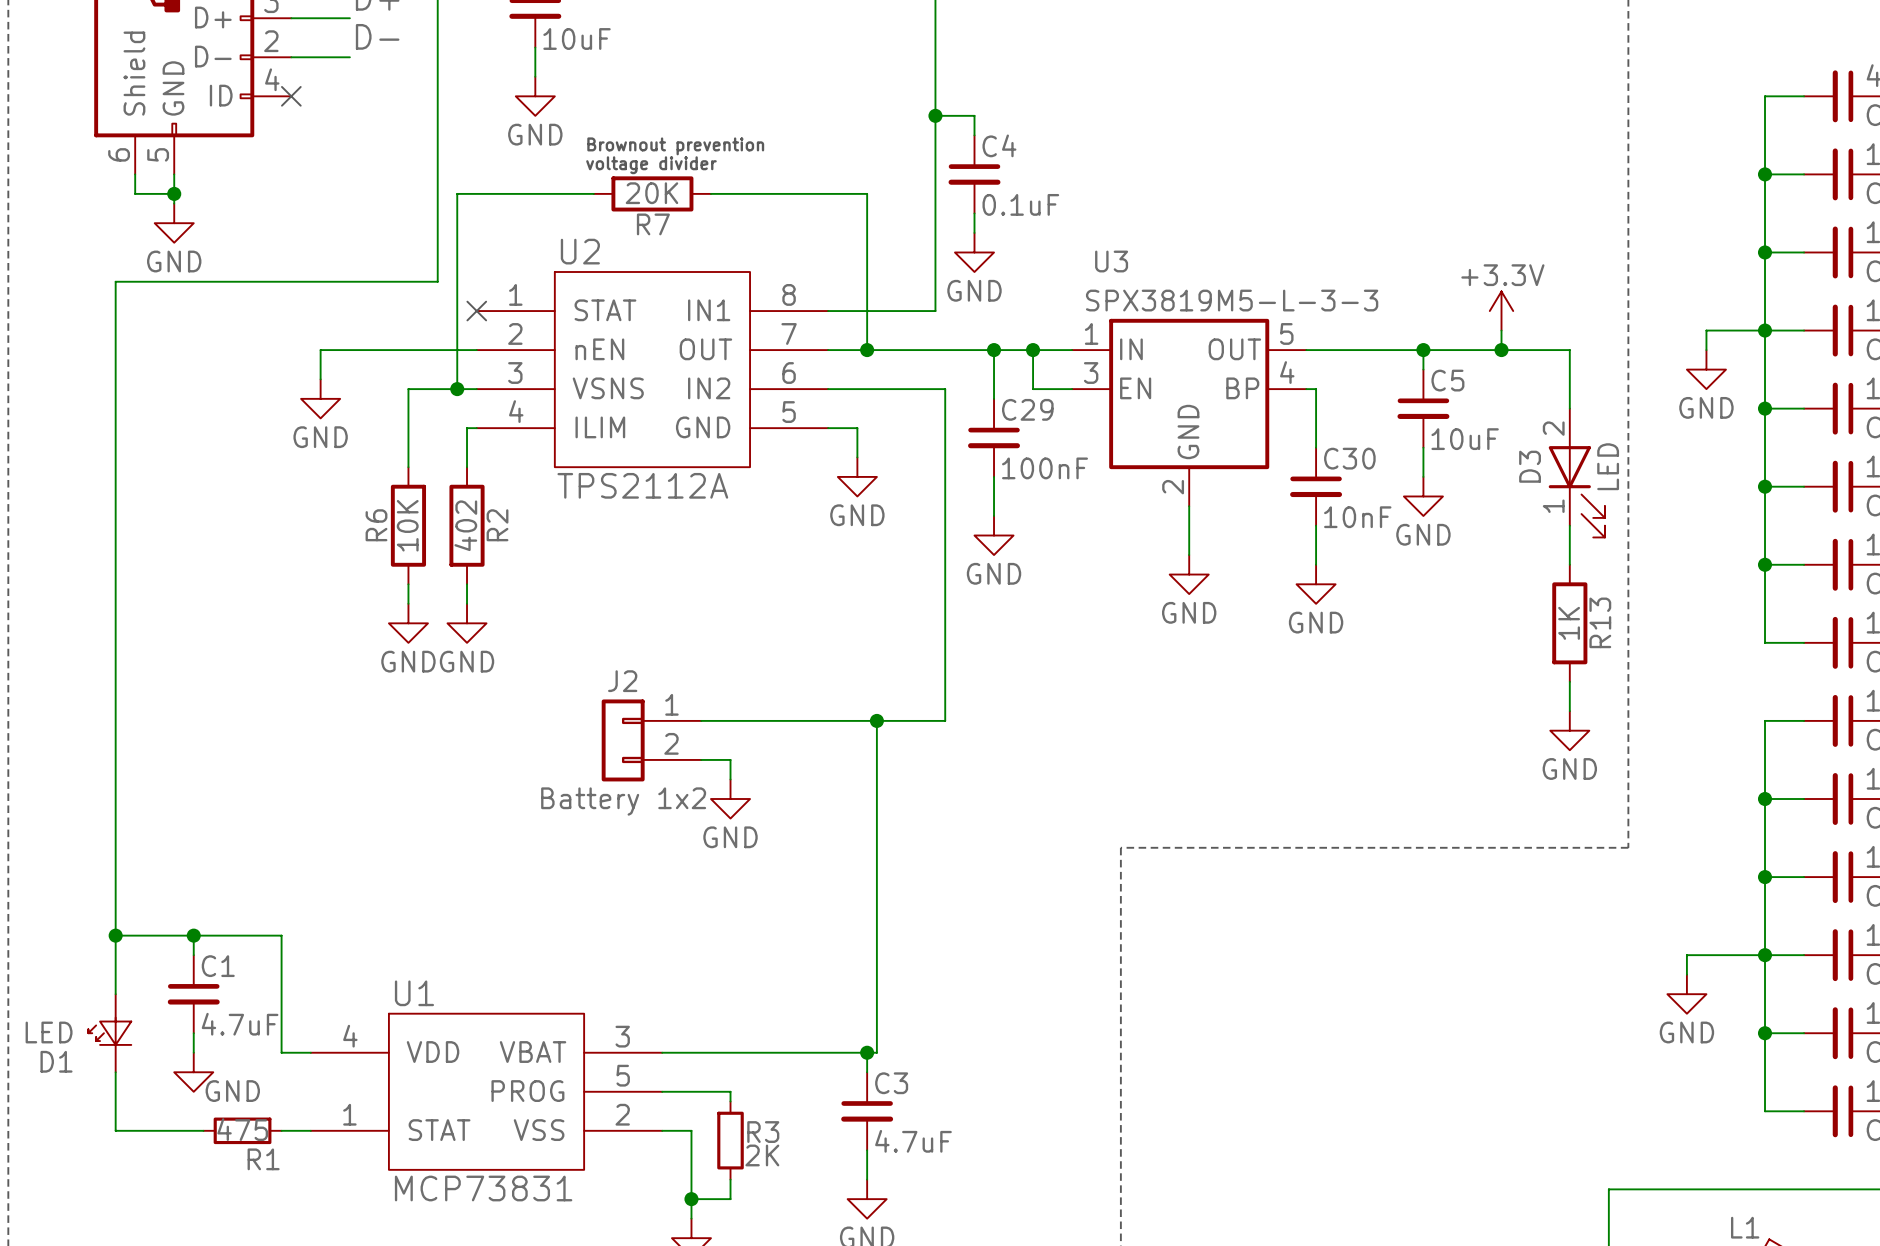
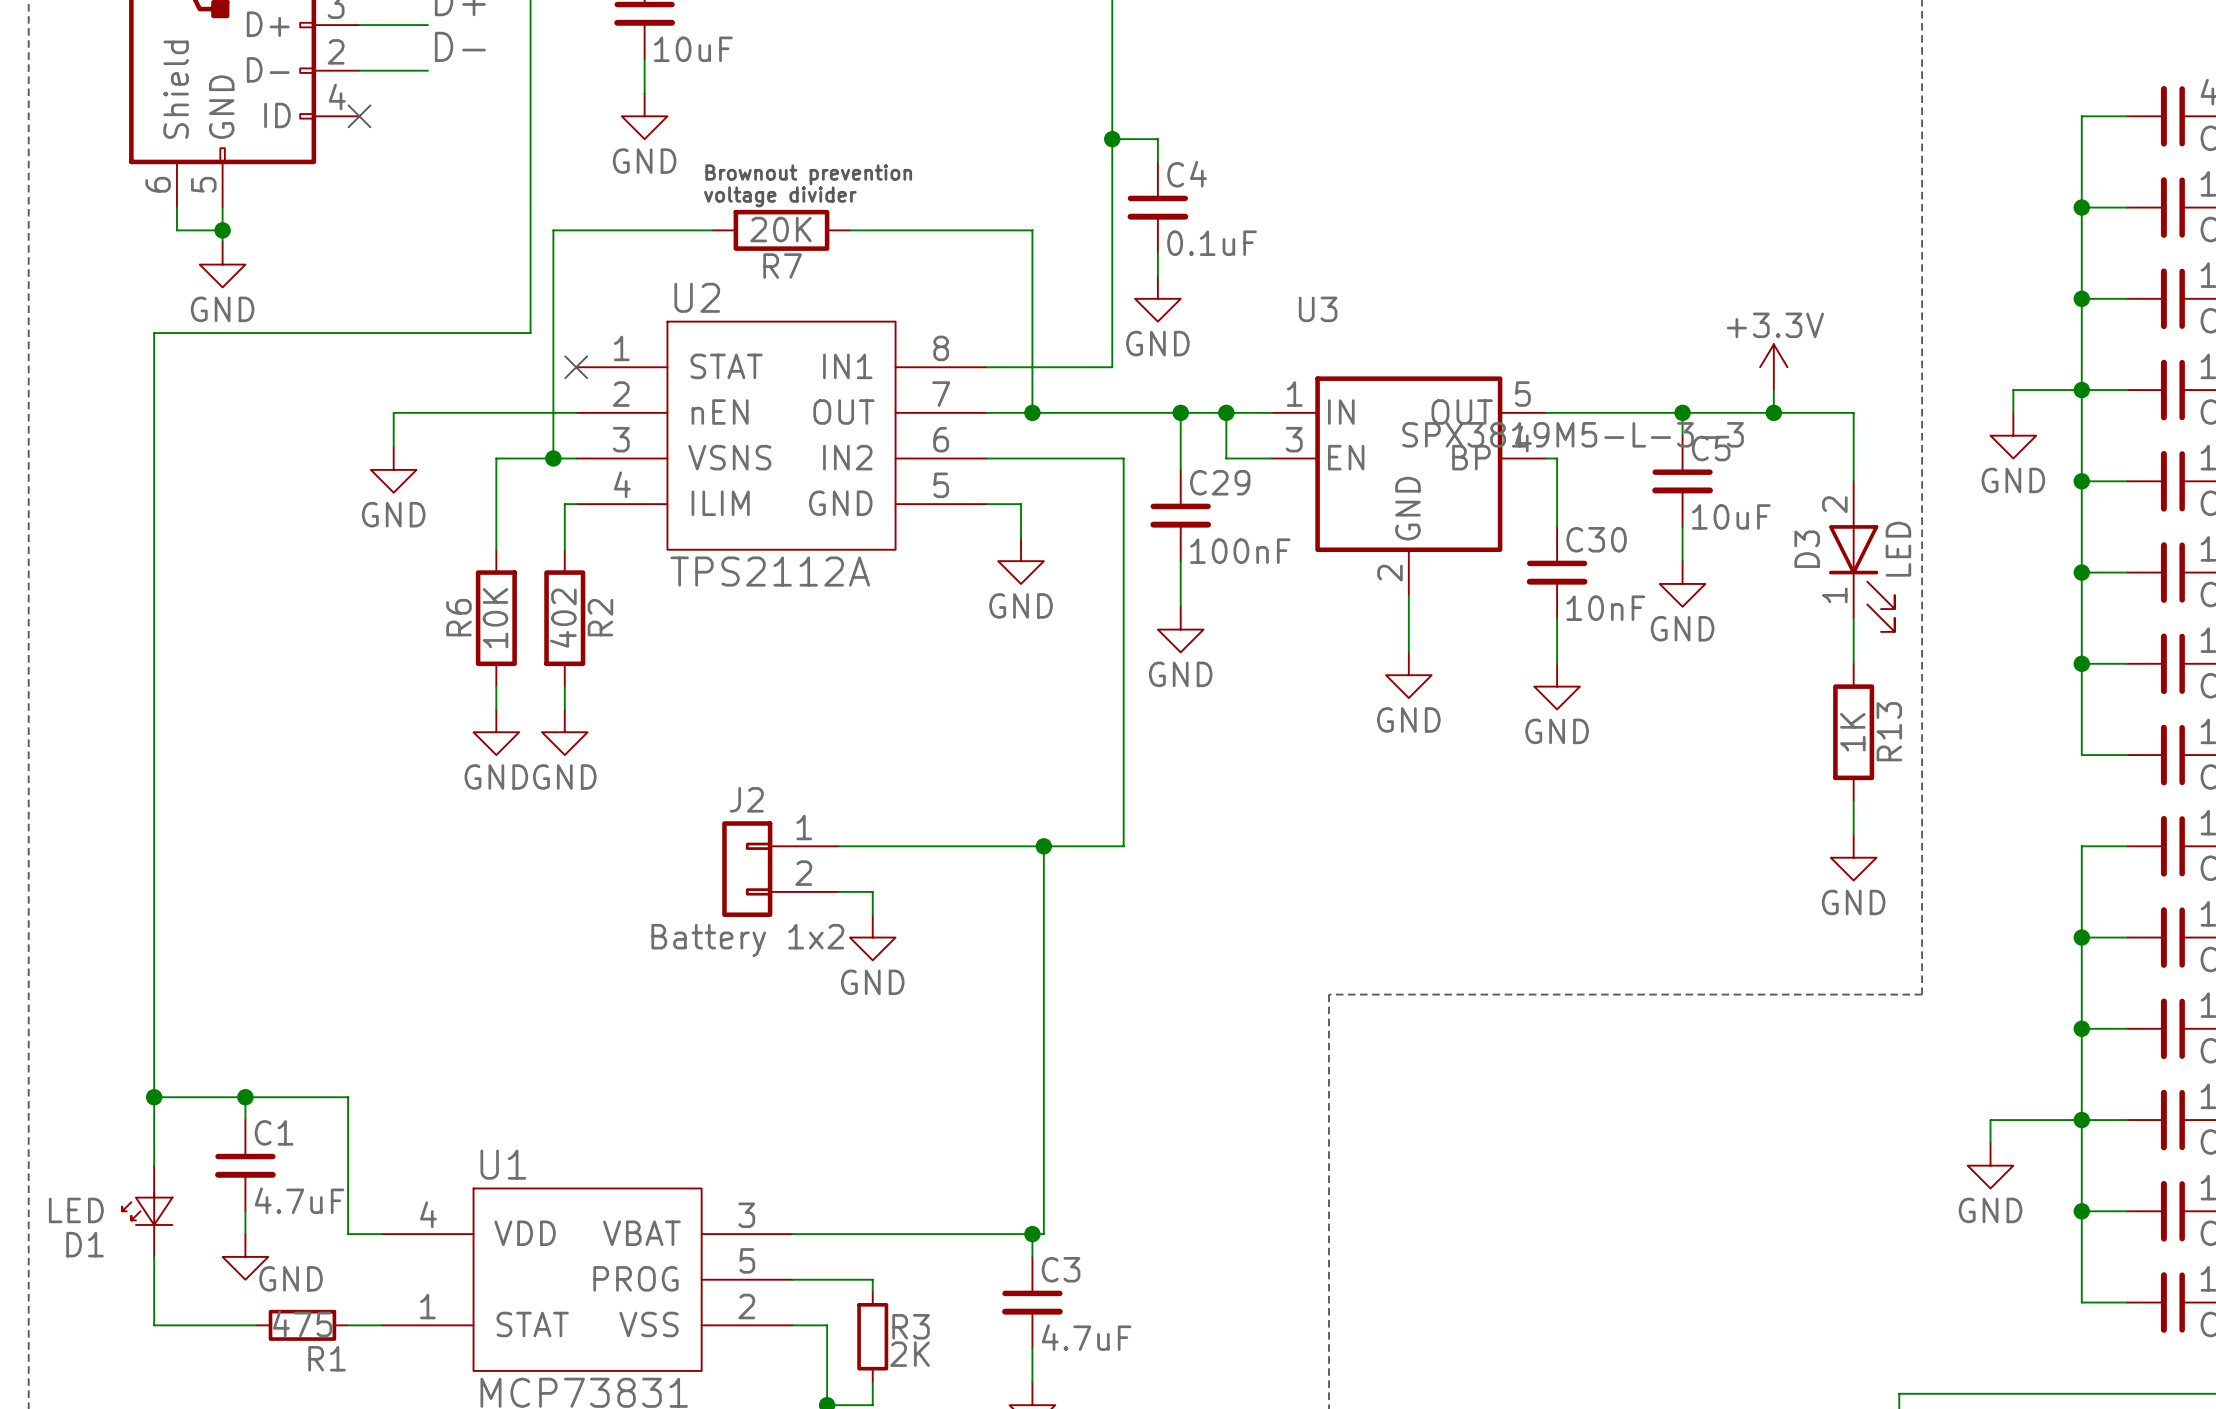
U3 value position: SPX3819M5-L-3-3 (1232, 300) -> SPX3819M5-L-3-3 (1573, 434)

